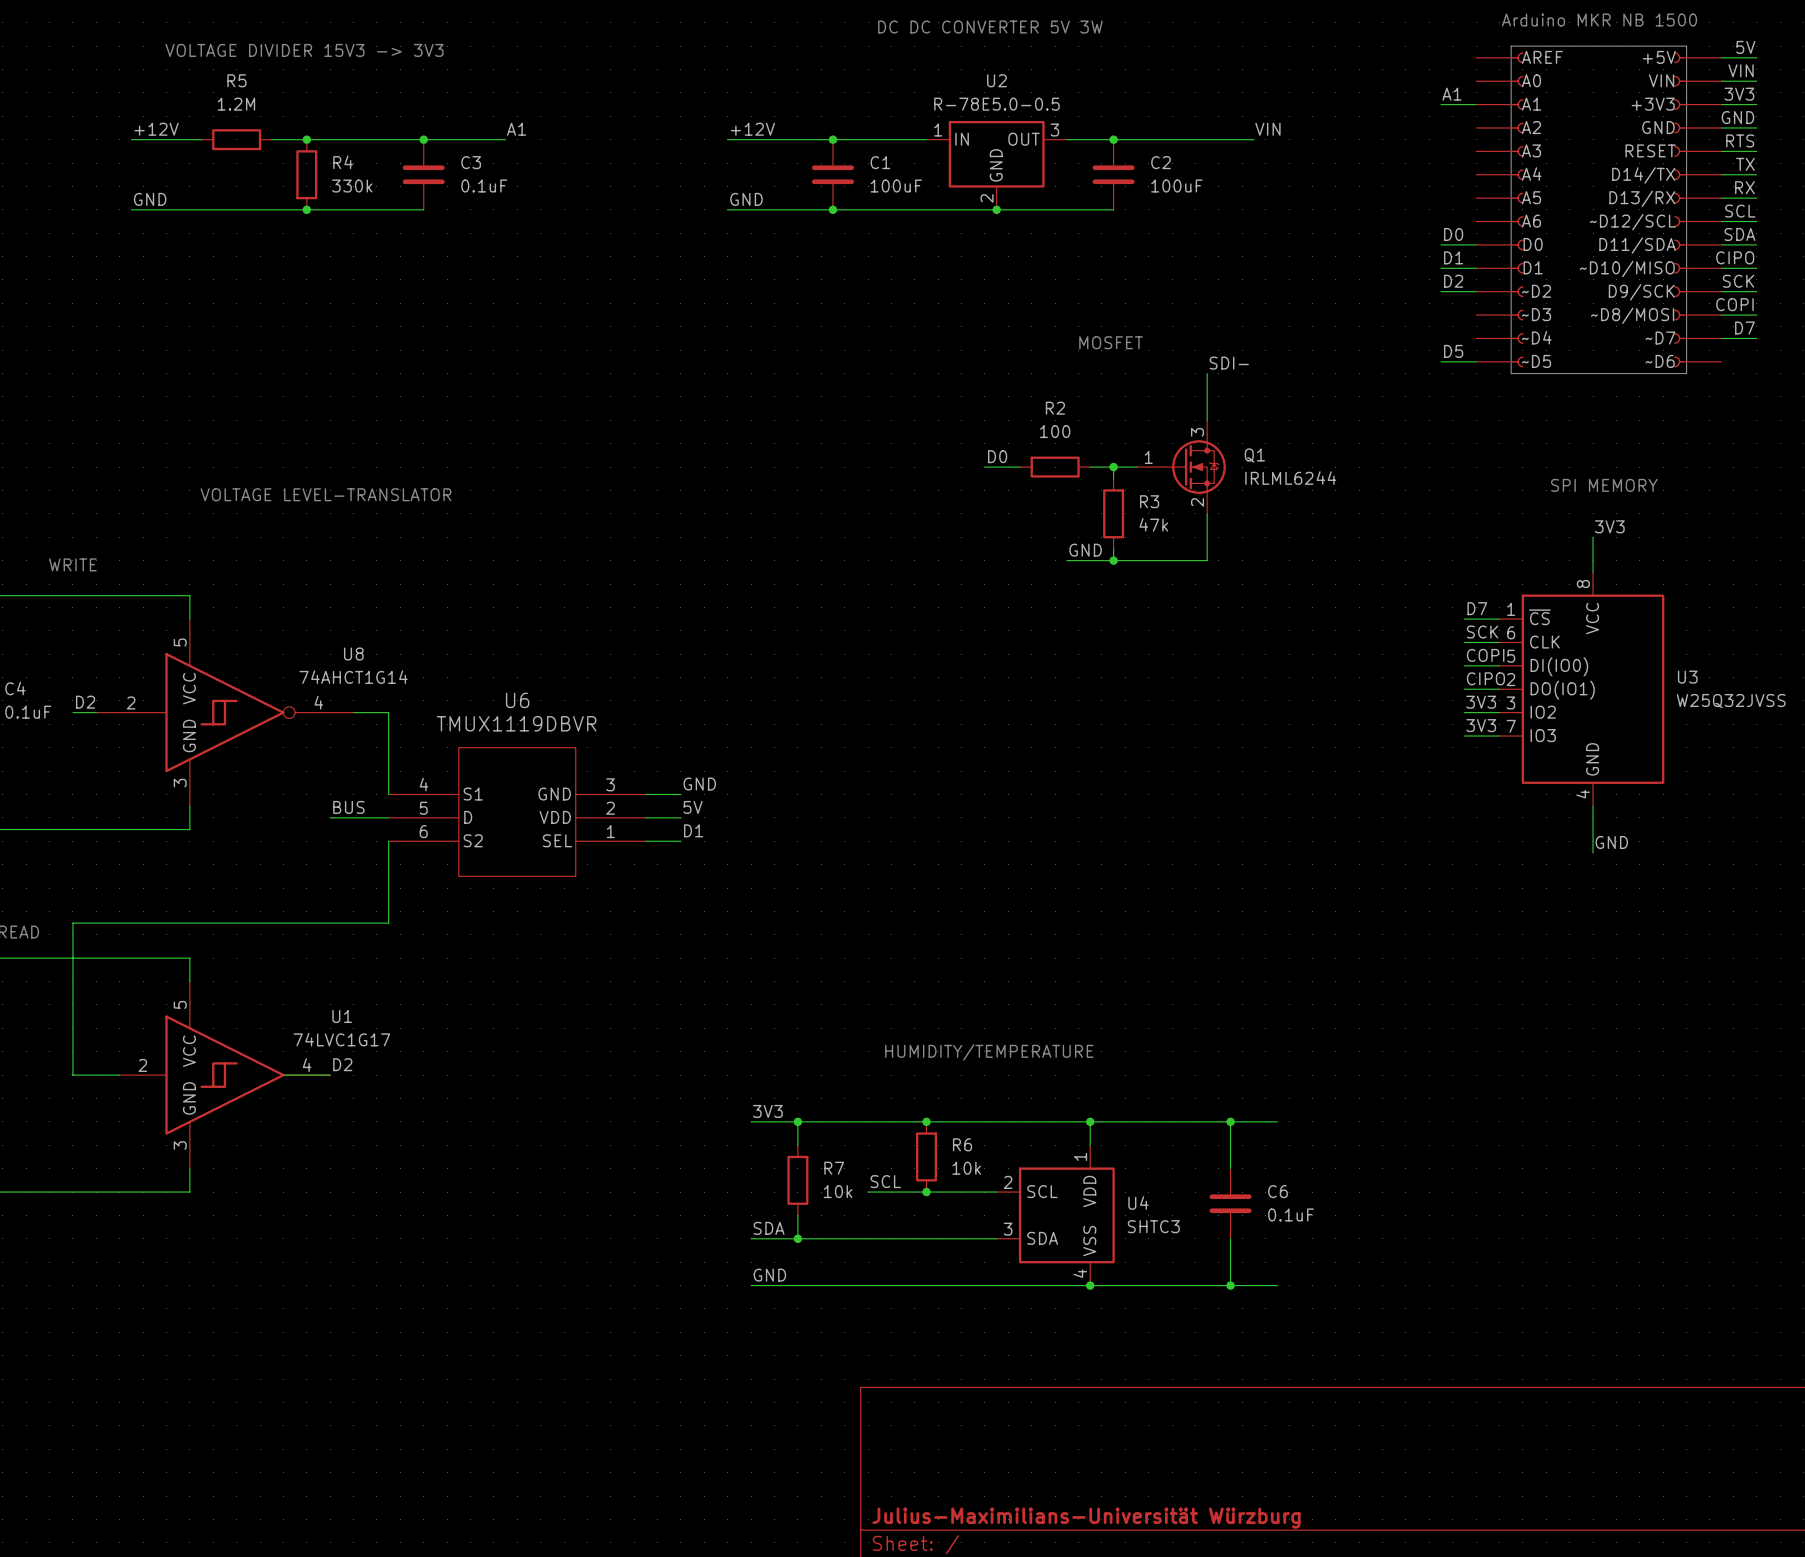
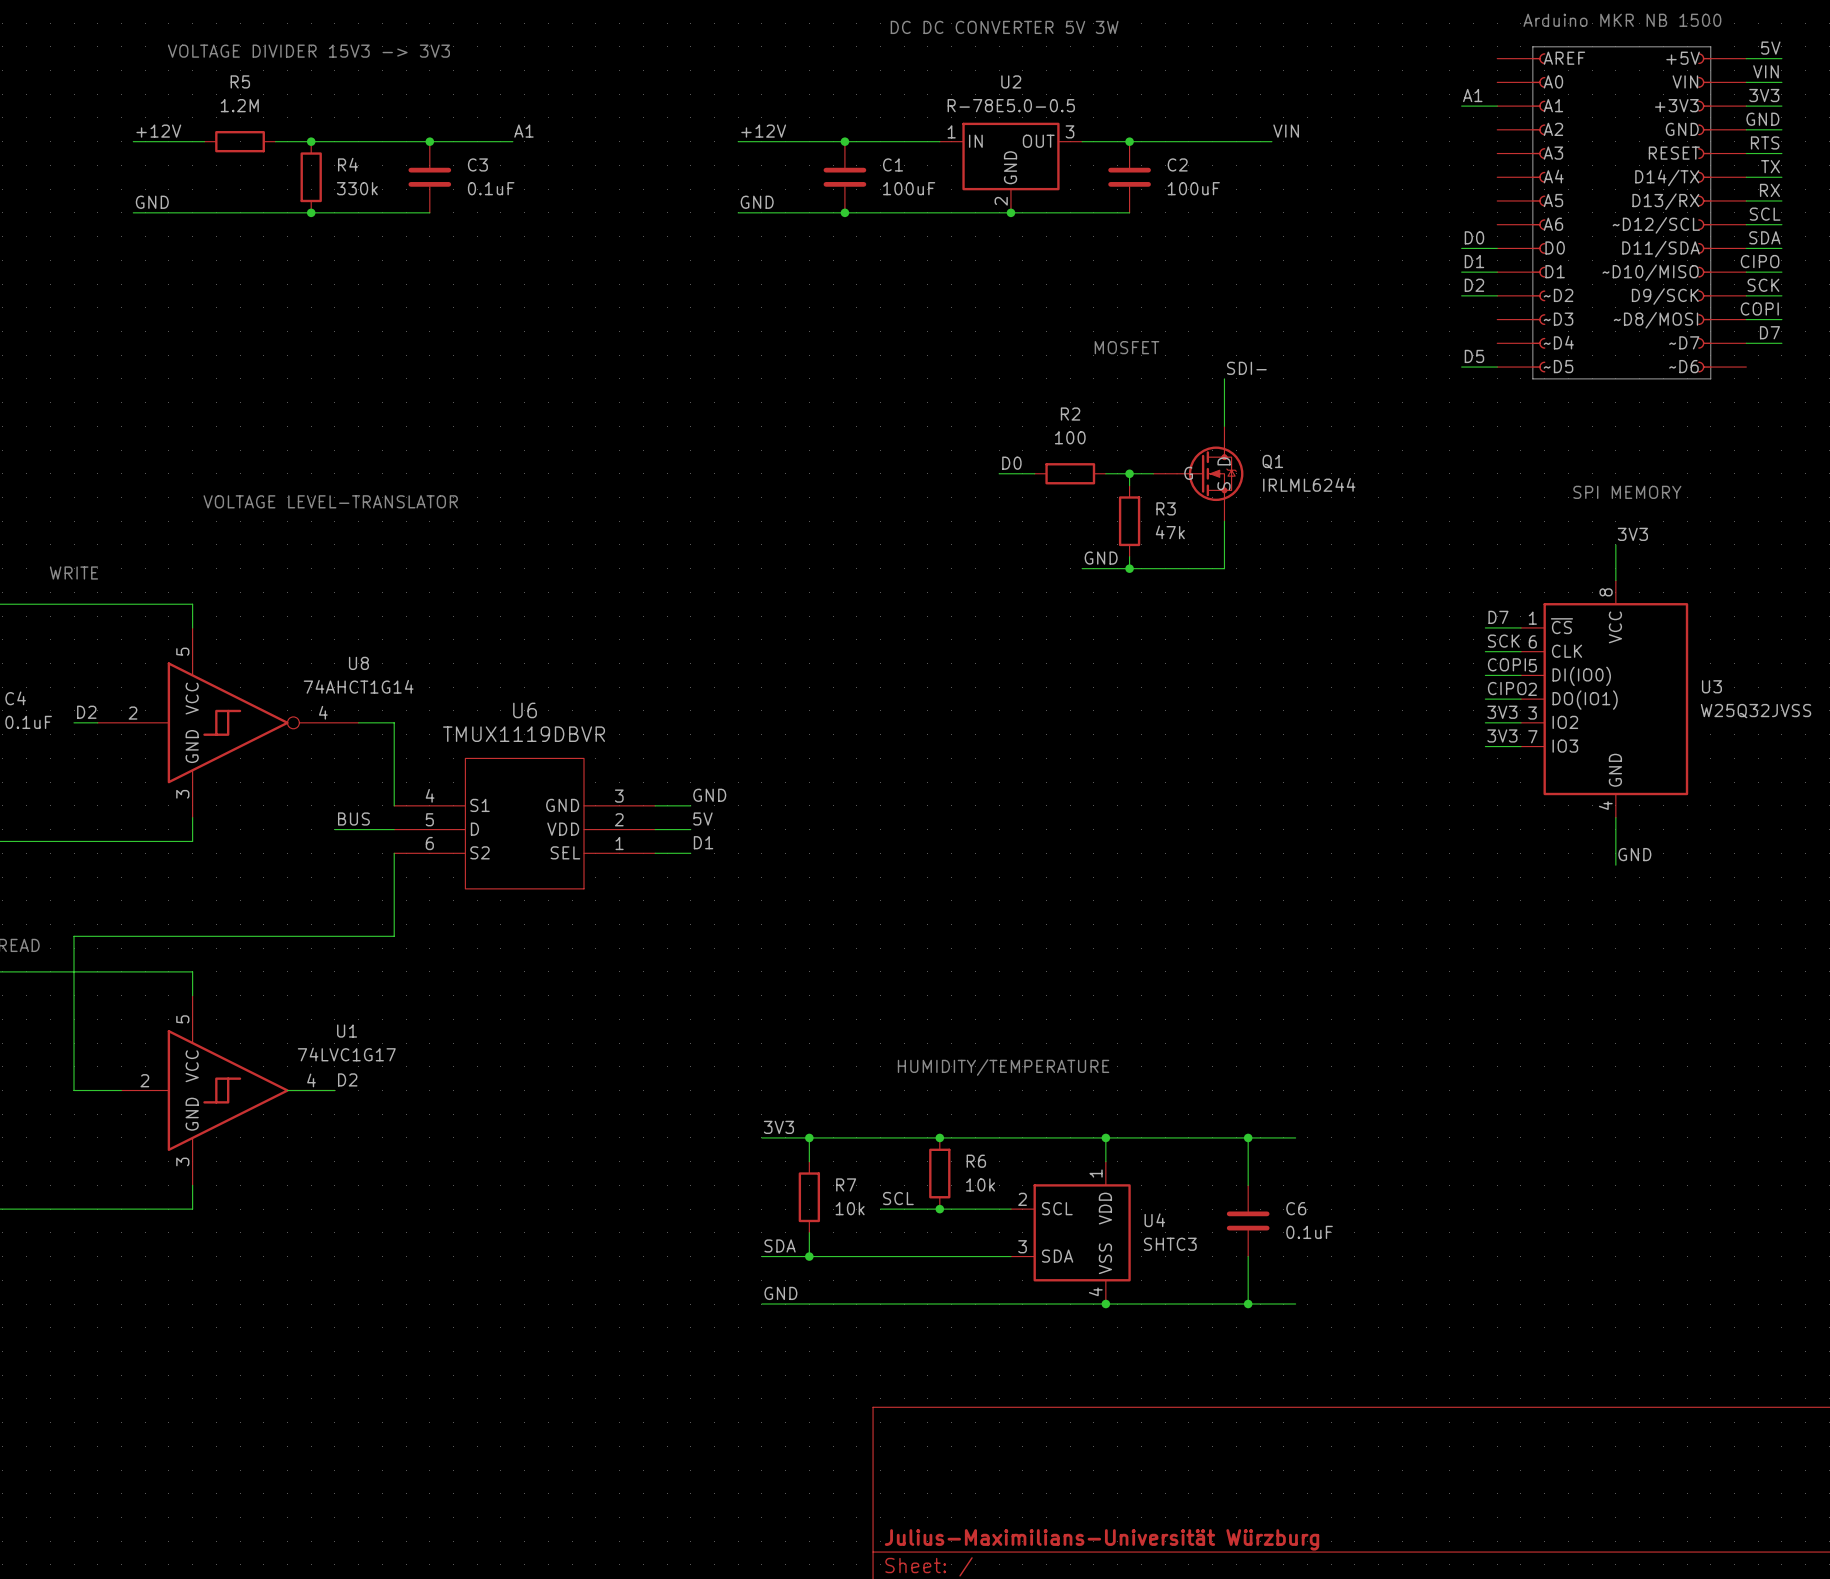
Q1 pin number: 3 (1197, 432) -> none
Q1 pin name: none -> D (1224, 461)
Q1 pin number: 1 (1148, 457) -> none
Q1 pin name: none -> G (1188, 473)
Q1 pin name: none -> S (1224, 486)
Q1 pin number: 2 (1197, 502) -> none

